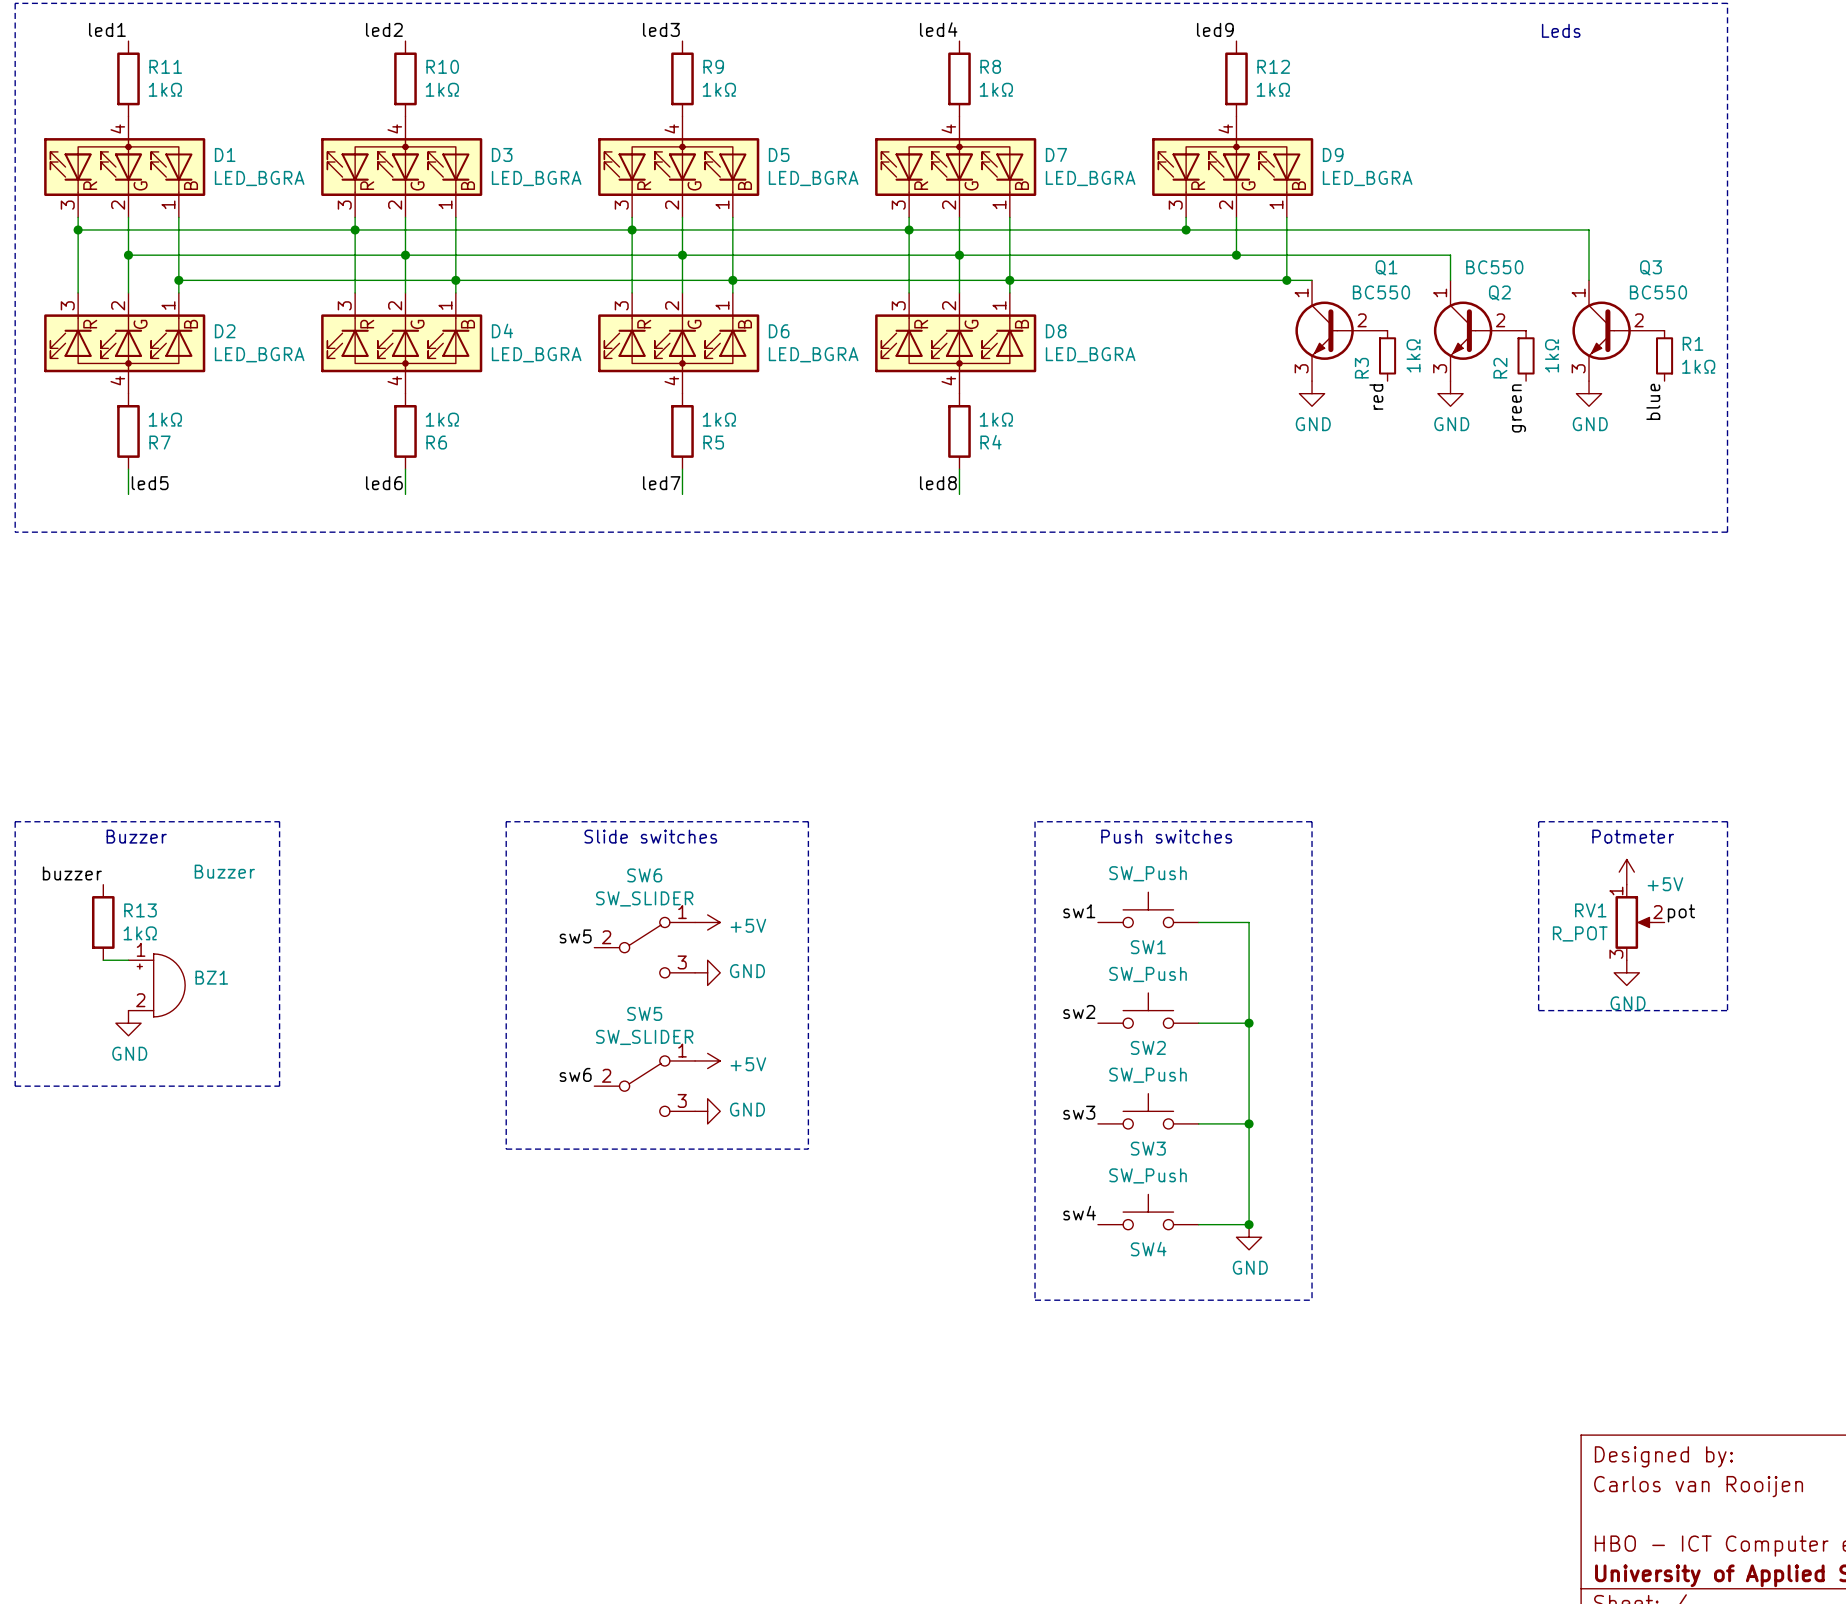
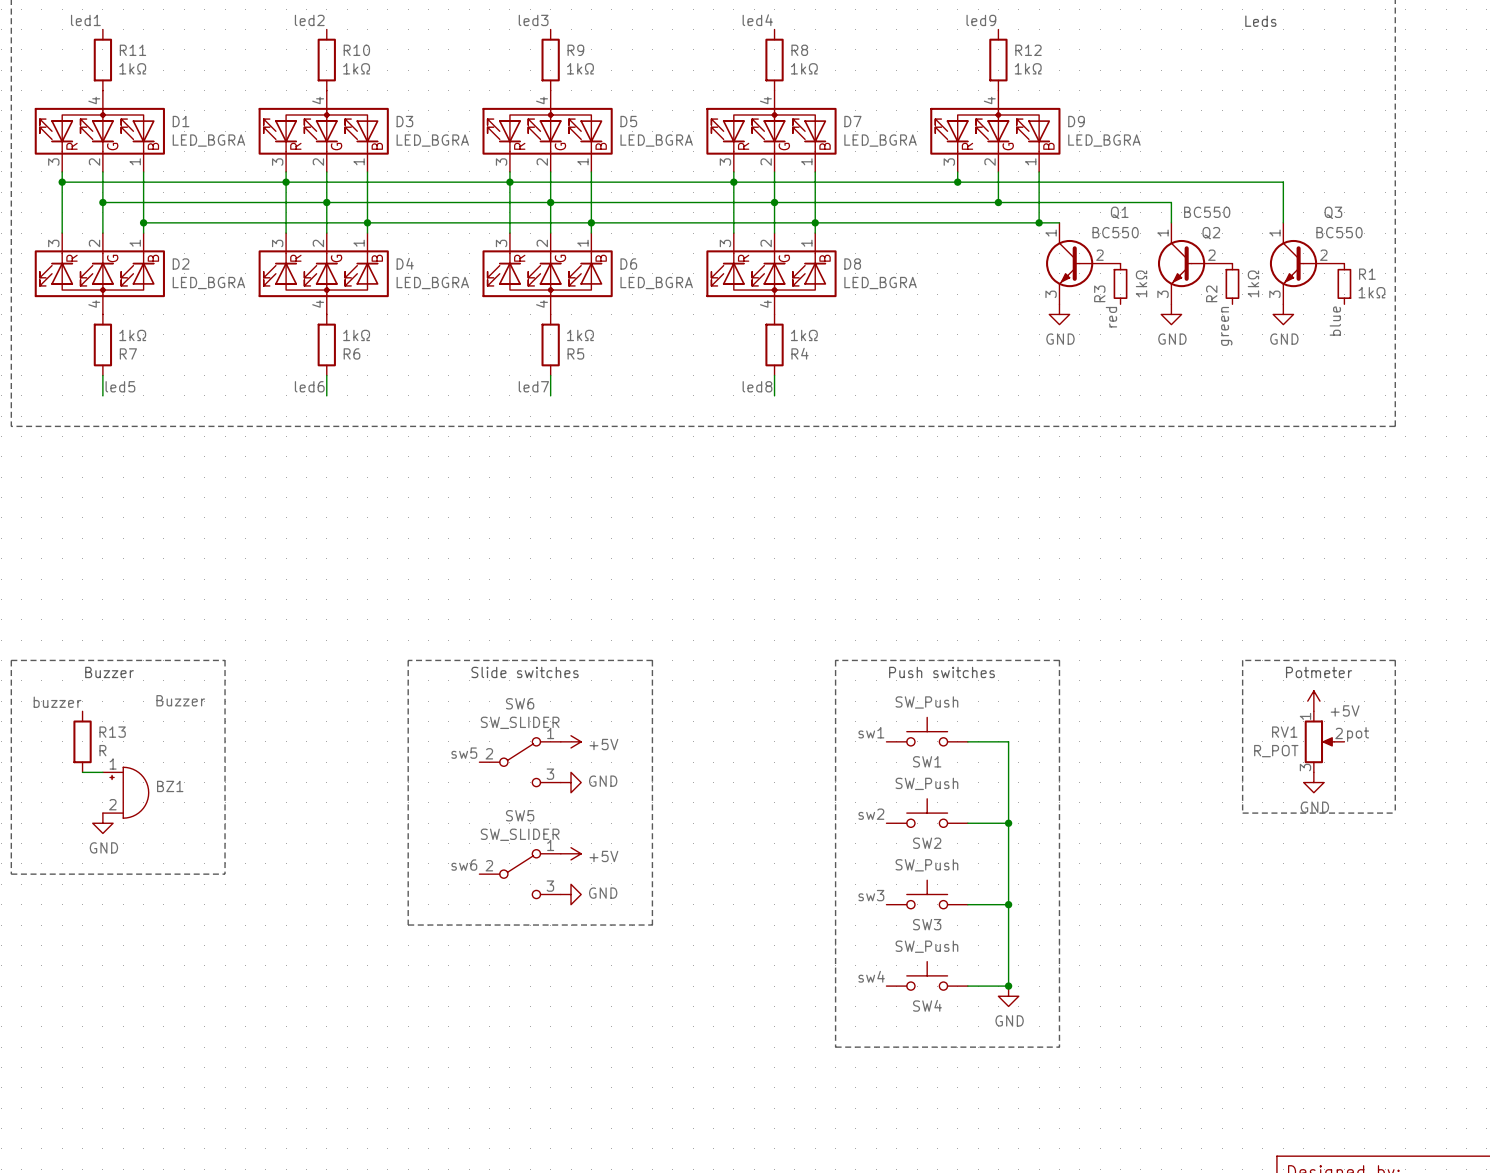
R13 value: 1kΩ (140, 933) -> R (102, 750)

